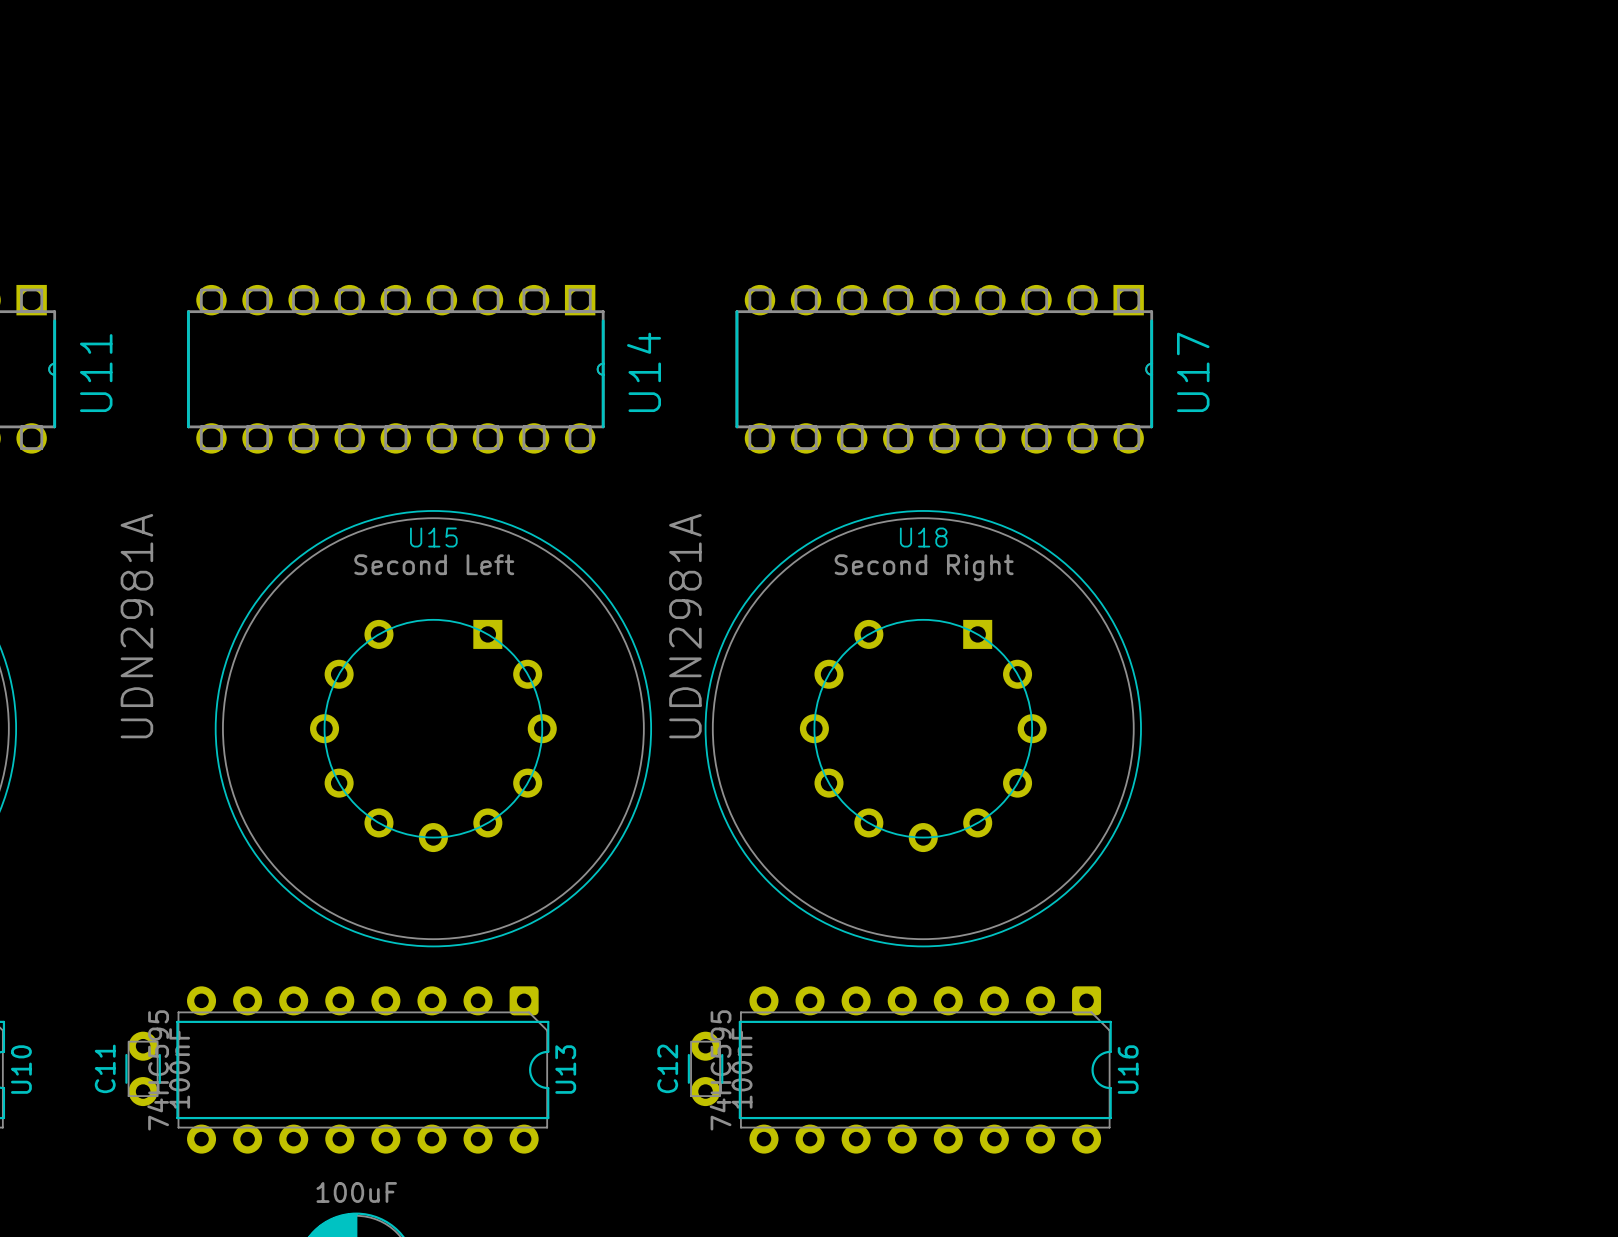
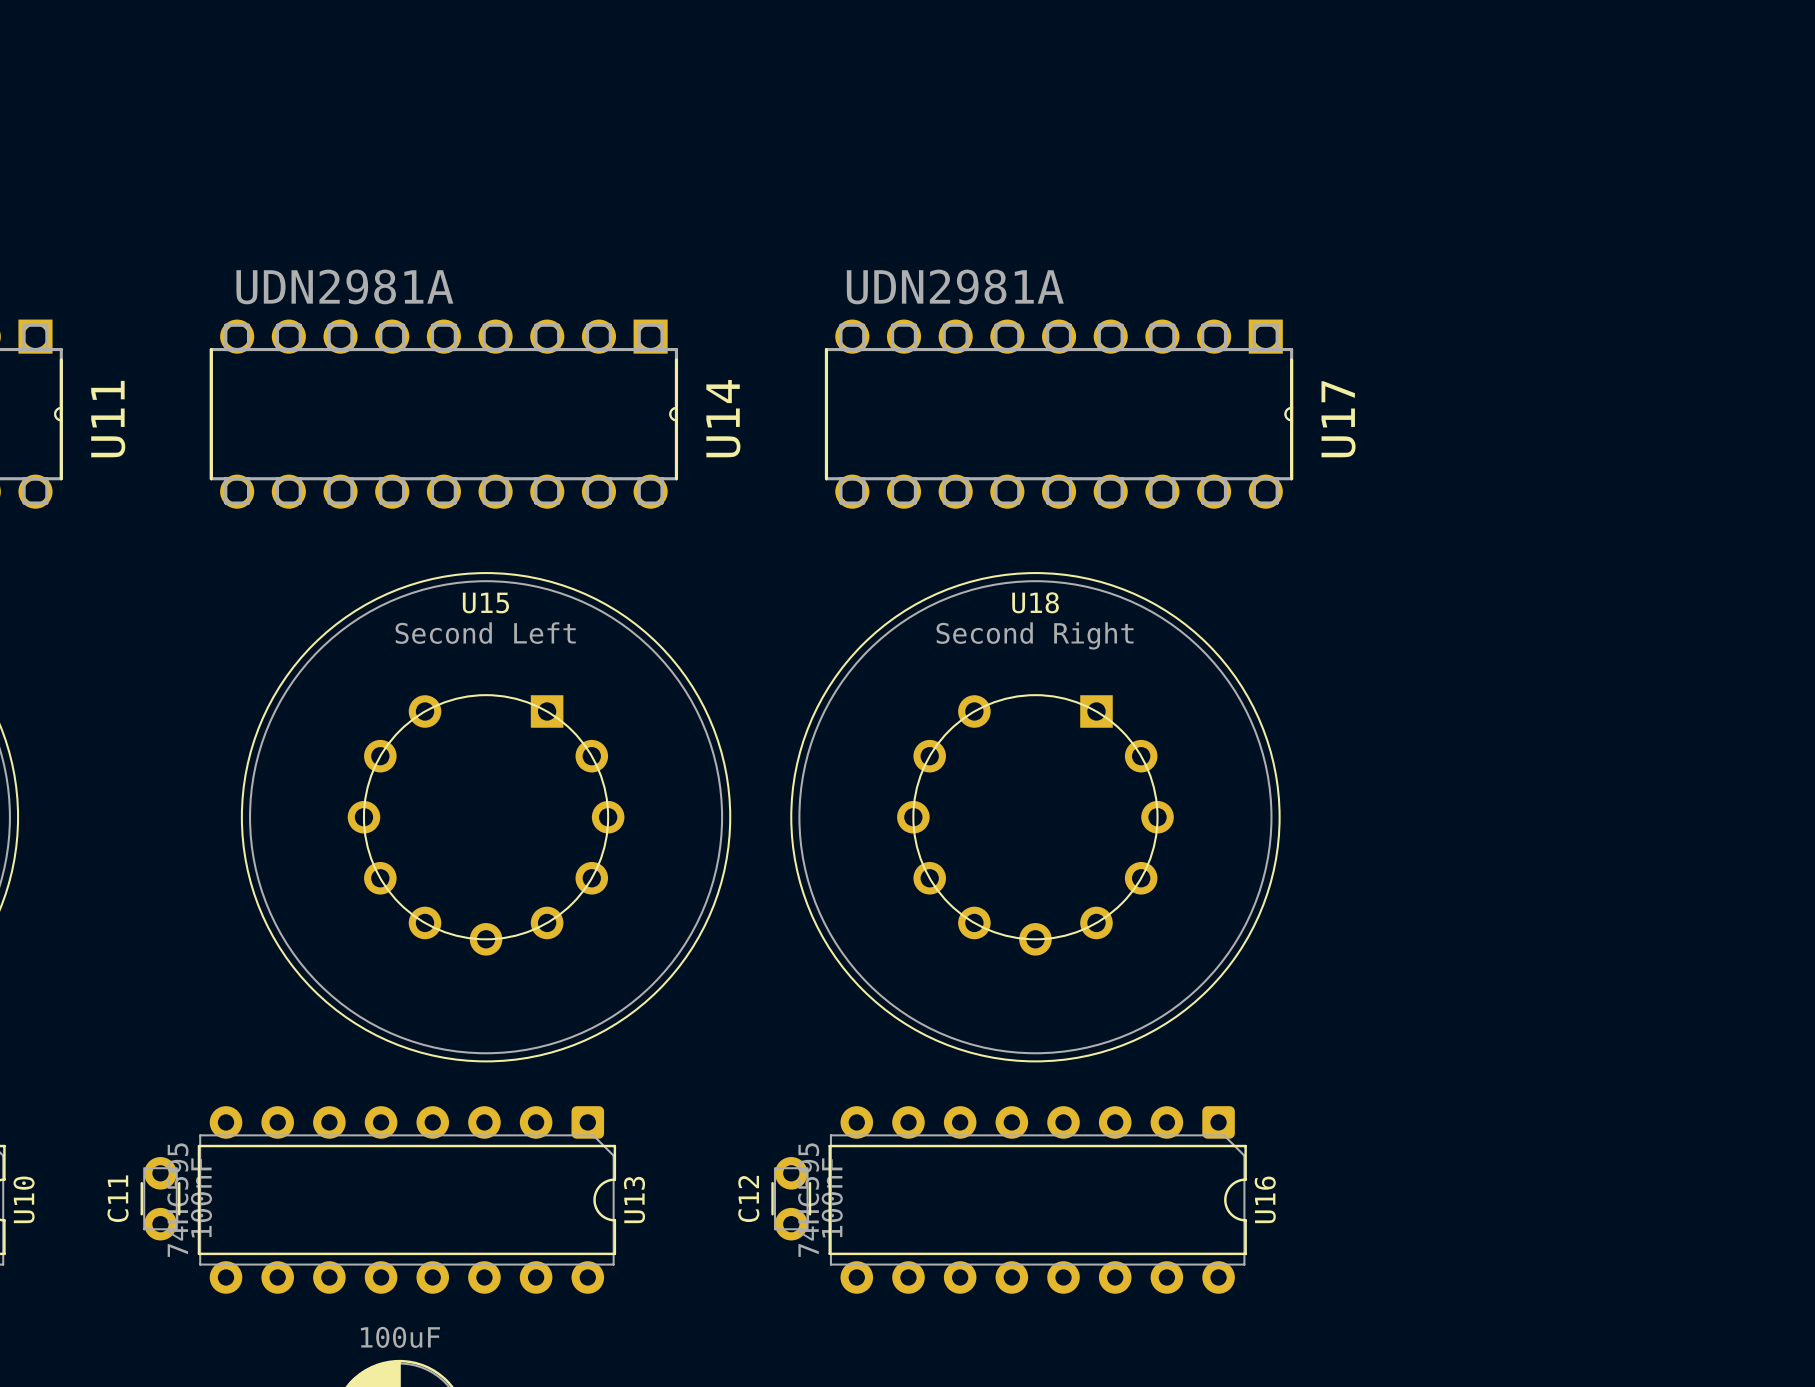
U14 value rotation: 0° (136, 626) -> 90° clockwise (344, 286)
U14 value position: UDN2981A (136, 626) -> UDN2981A (344, 286)
U17 value rotation: 0° (685, 626) -> 90° clockwise (955, 286)
U17 value position: UDN2981A (685, 626) -> UDN2981A (955, 286)

